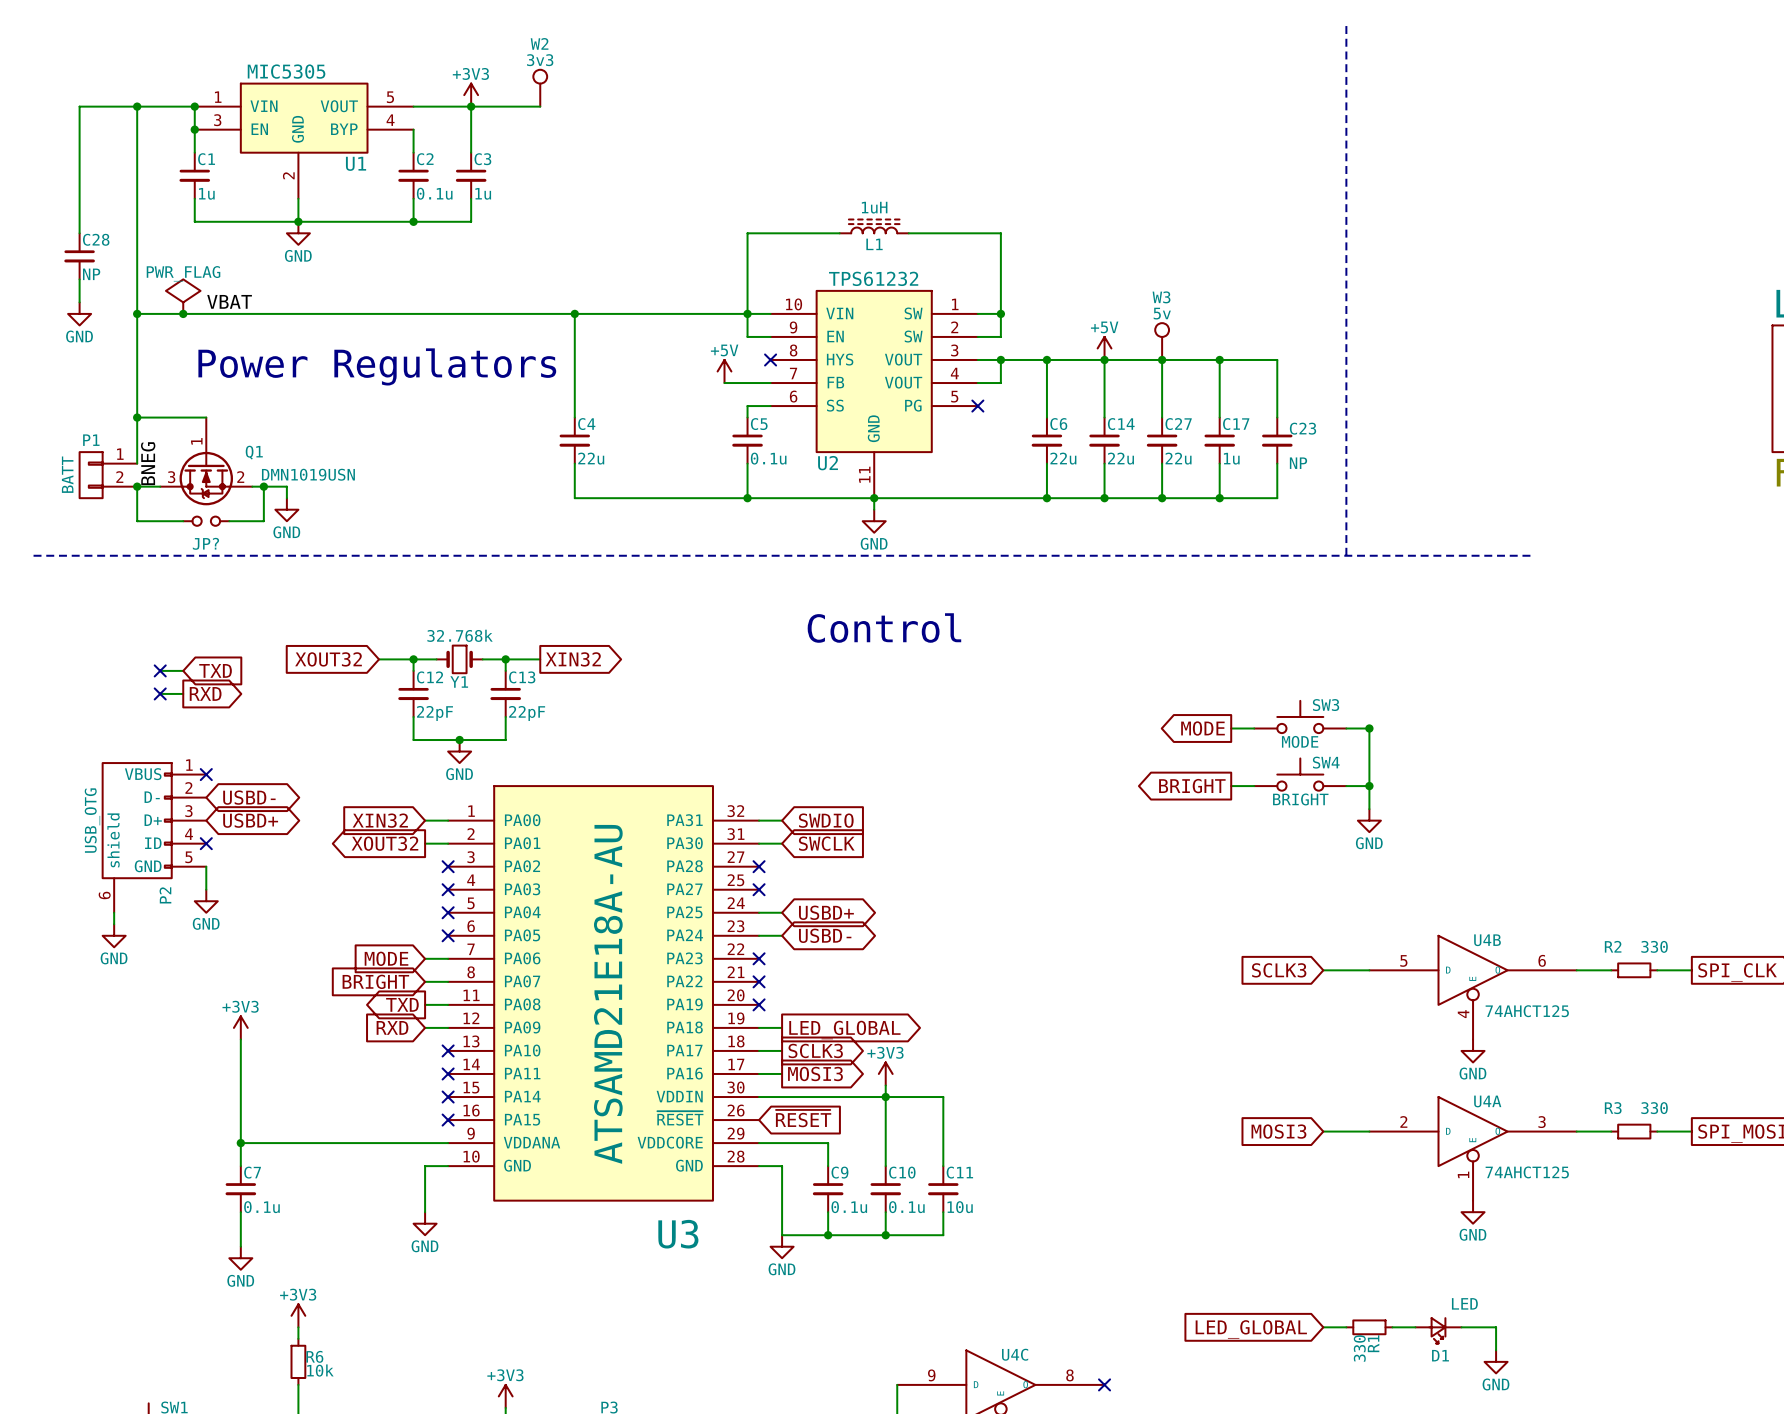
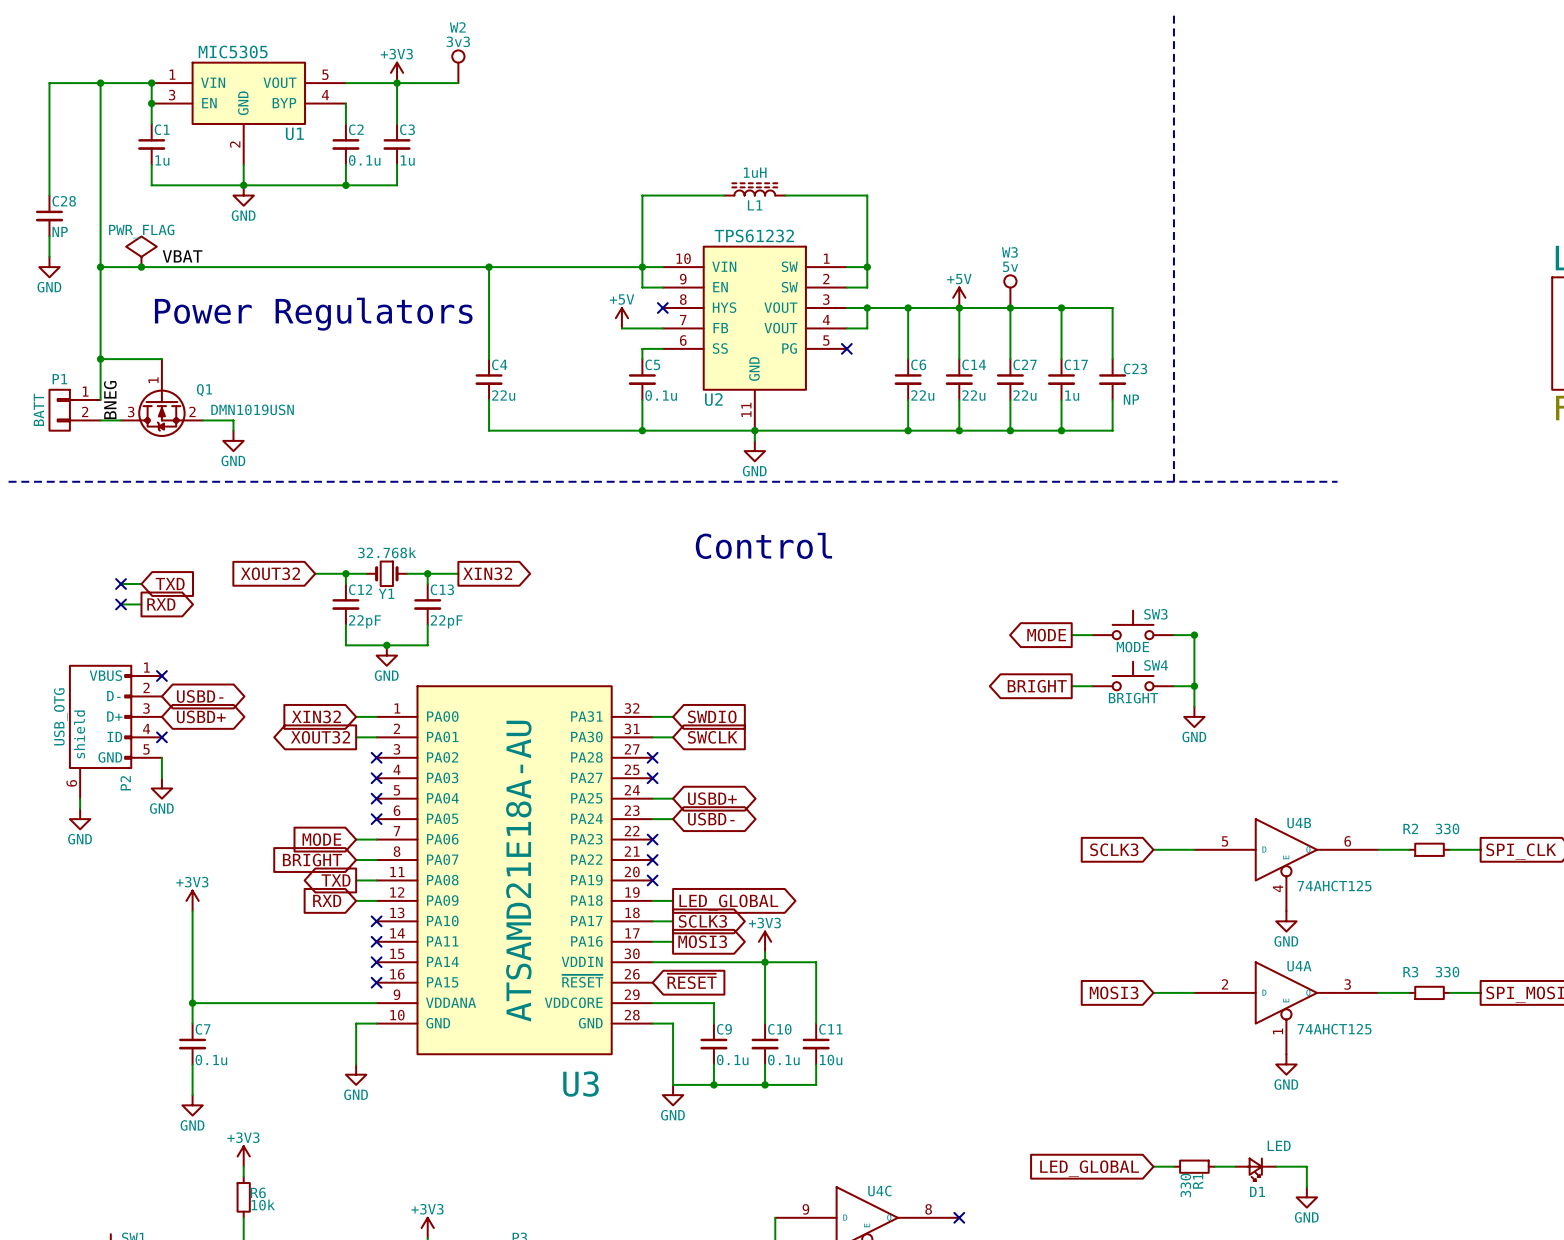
wire: (137, 486) (137, 521) (183, 521) -> none
junction: (137, 486) -> none
wire: (263, 486) (263, 521) (229, 521) -> none
junction: (263, 486) -> none
JP?: (206, 521) -> none

